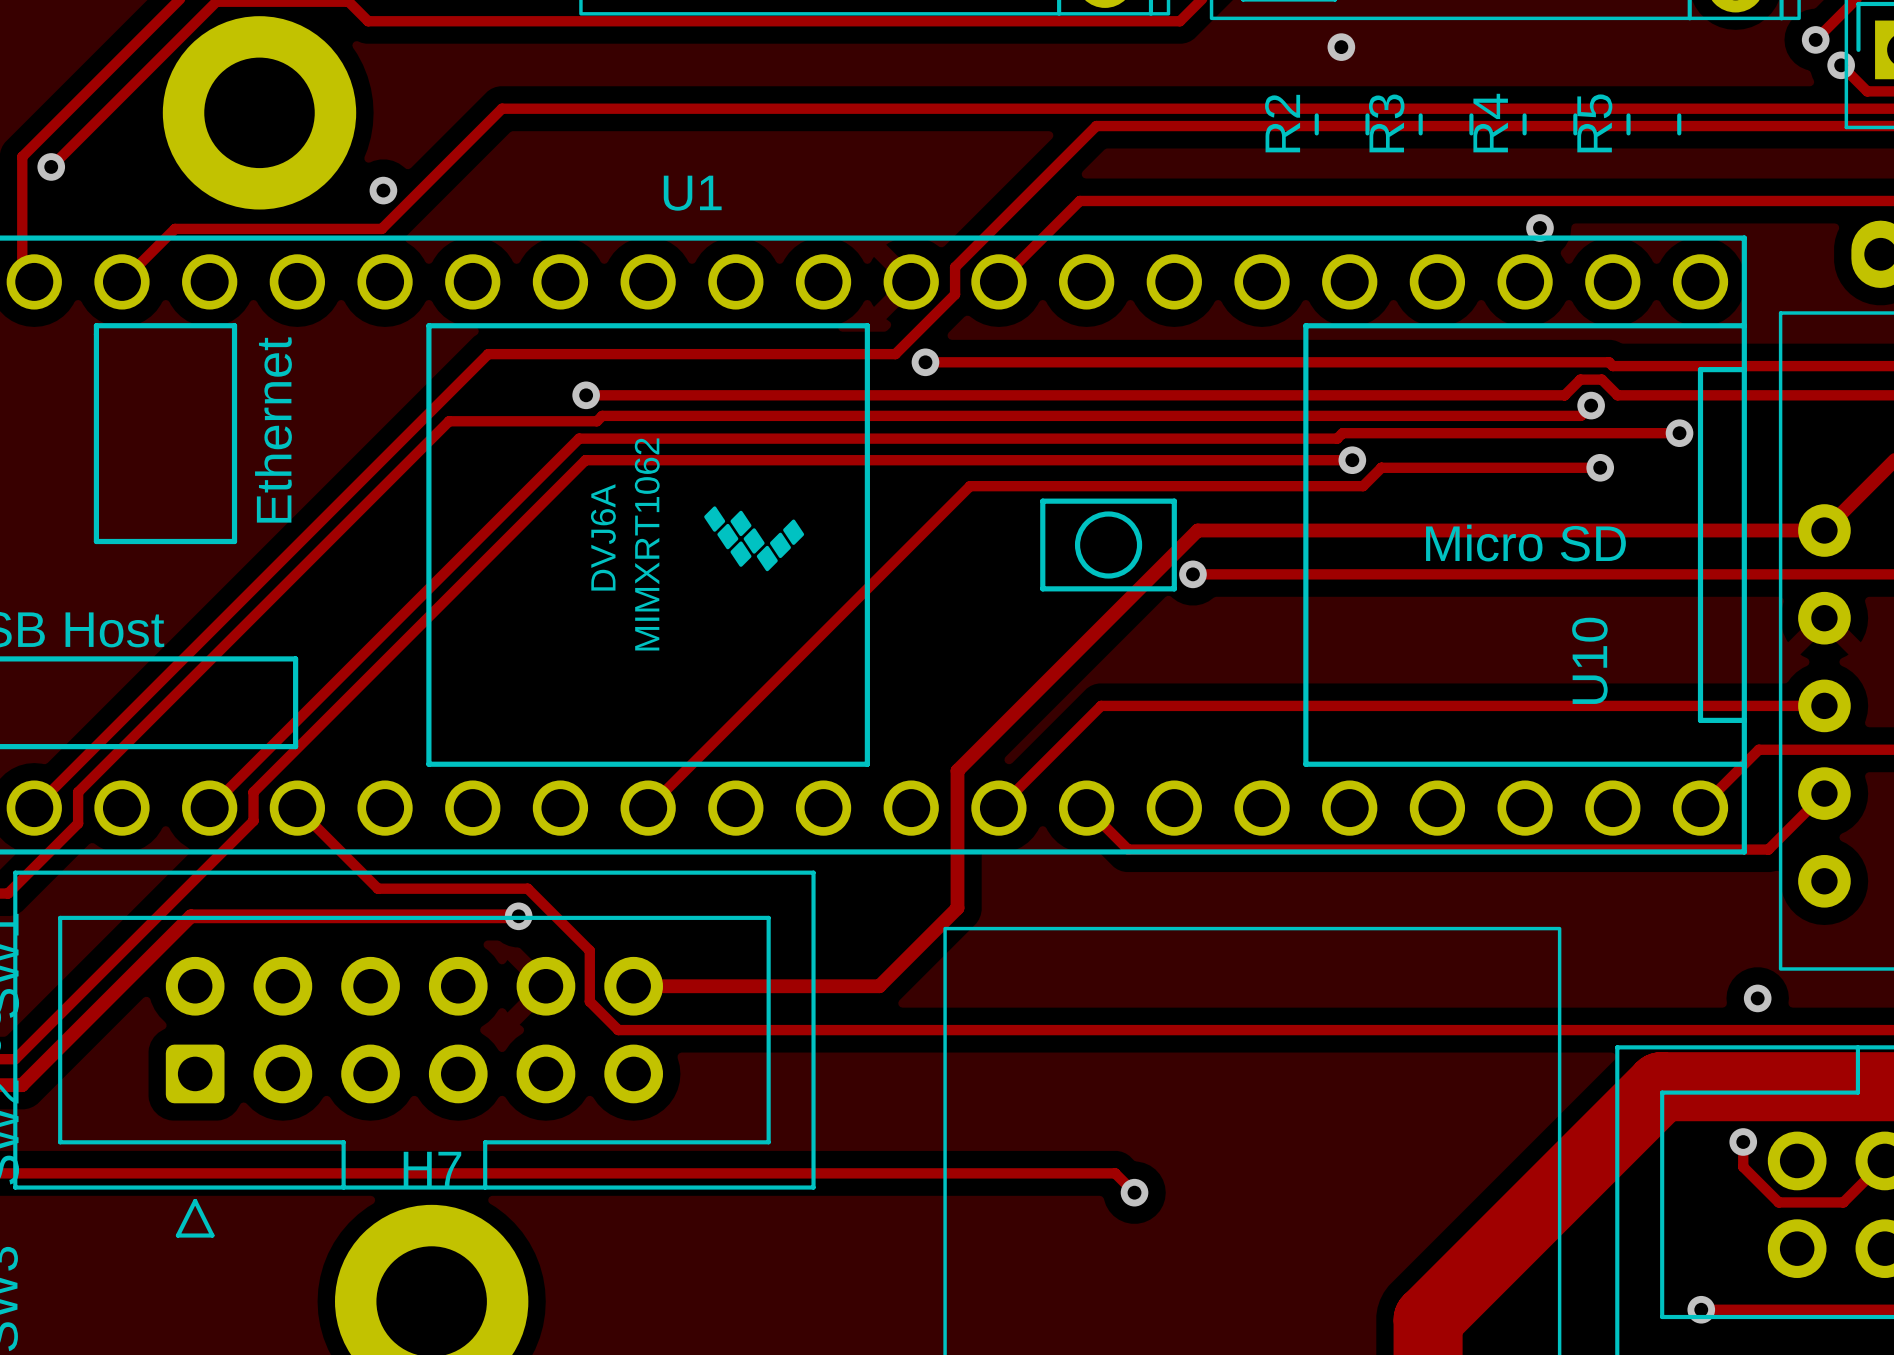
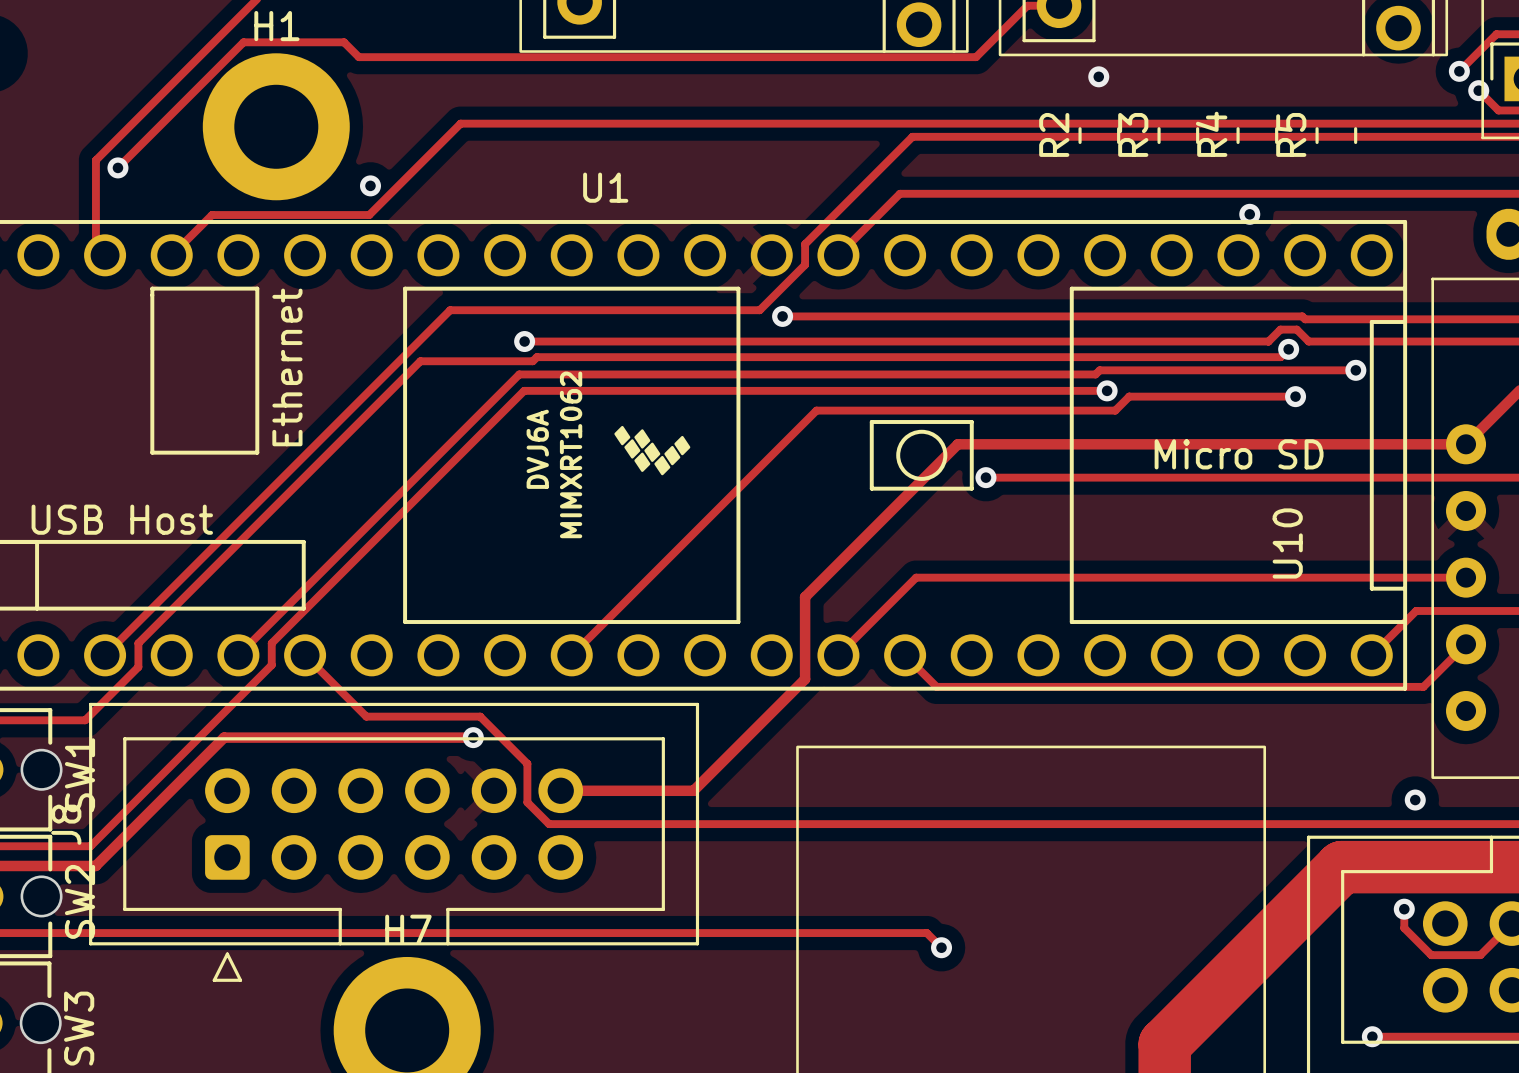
track: (1197, 530) (957, 770) (957, 908) (879, 986) (808, 986) -> (989, 444) (957, 444) (805, 597) (805, 679) (693, 790)

